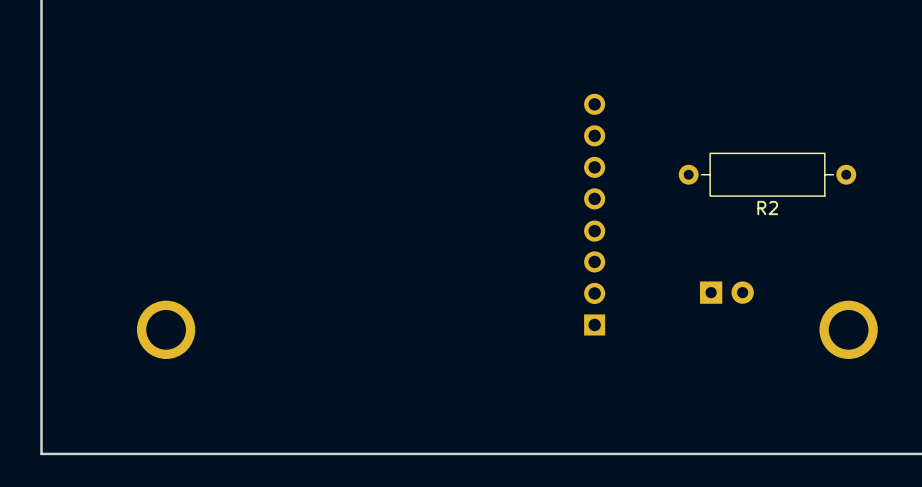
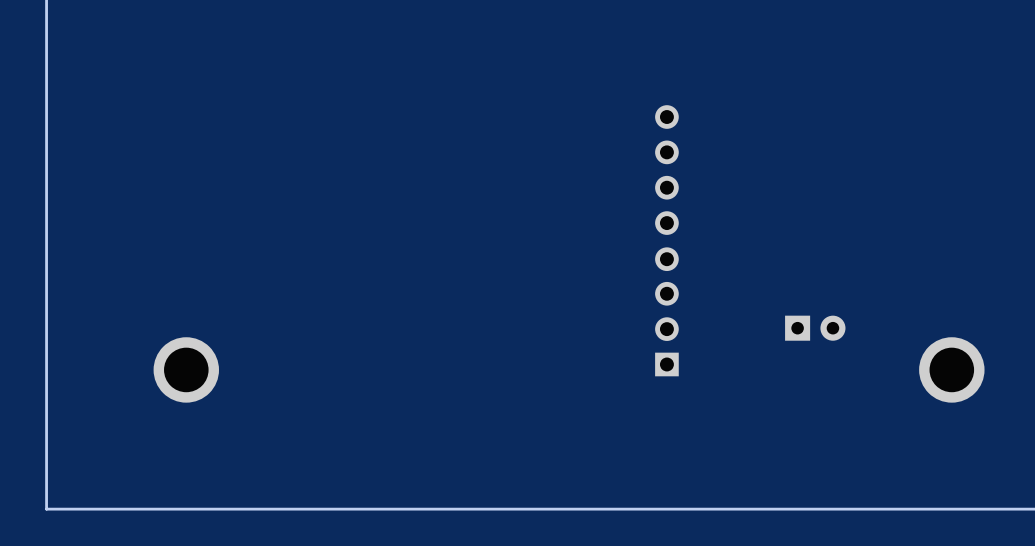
R2: (767, 174) -> none

